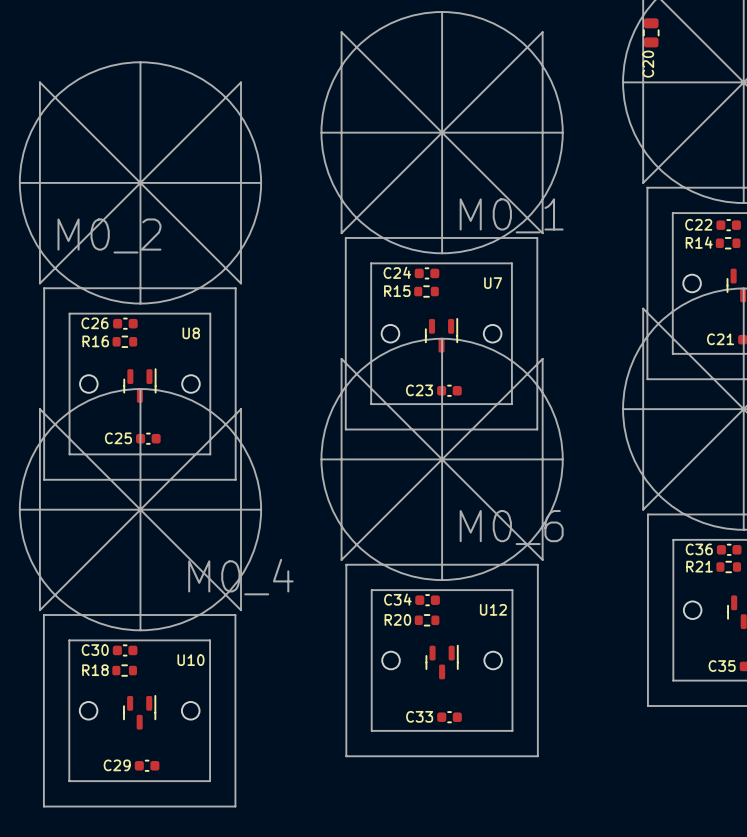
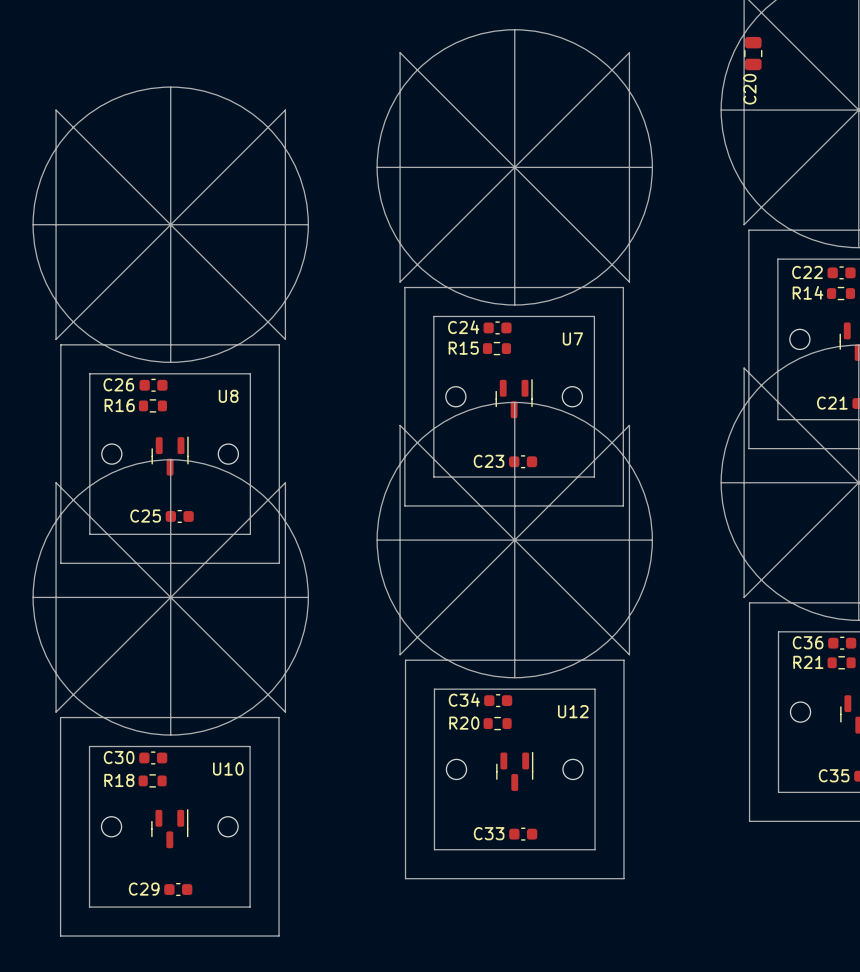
text: M0_1 (511, 215) -> none
text: M0_2 (109, 235) -> none
text: M0_6 (511, 527) -> none
text: M0_4 (240, 577) -> none

